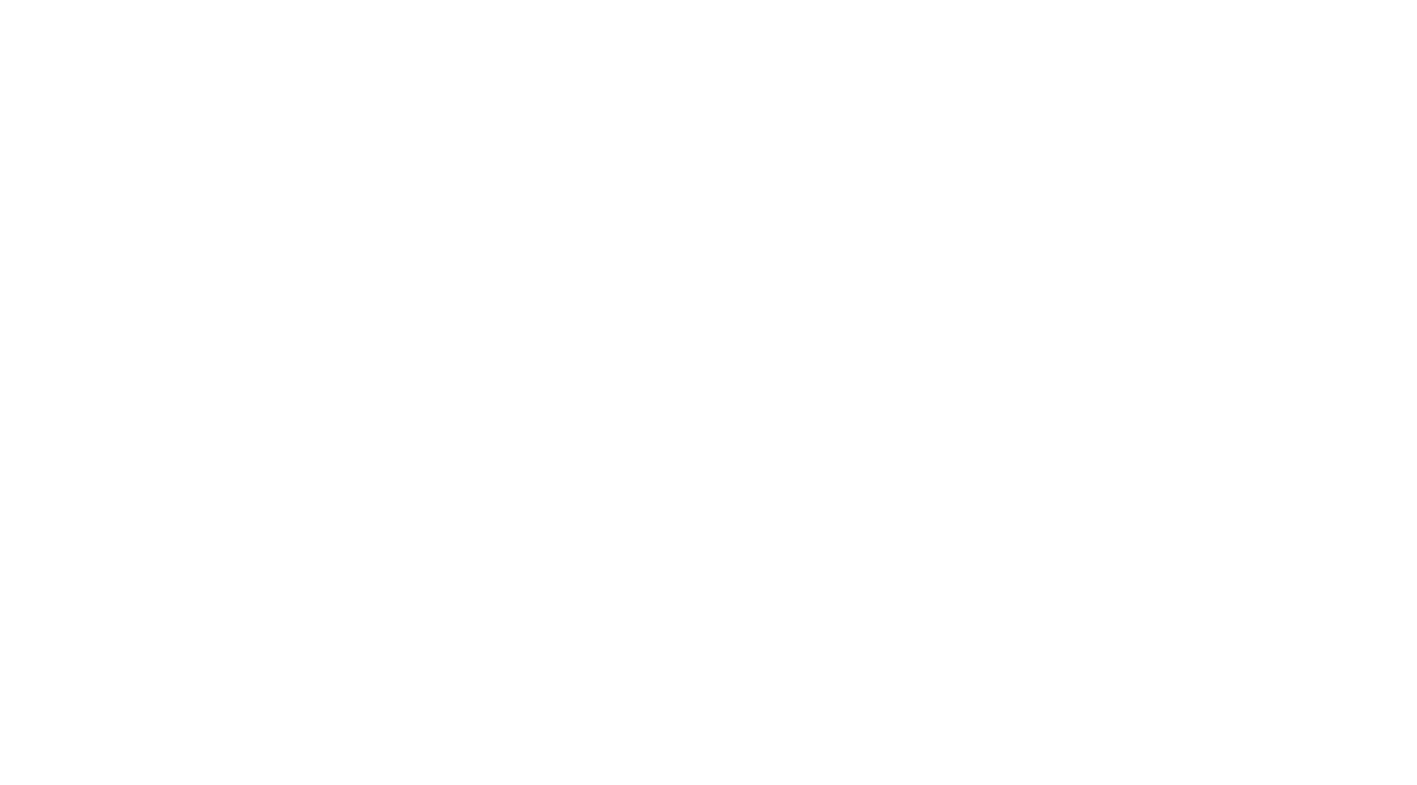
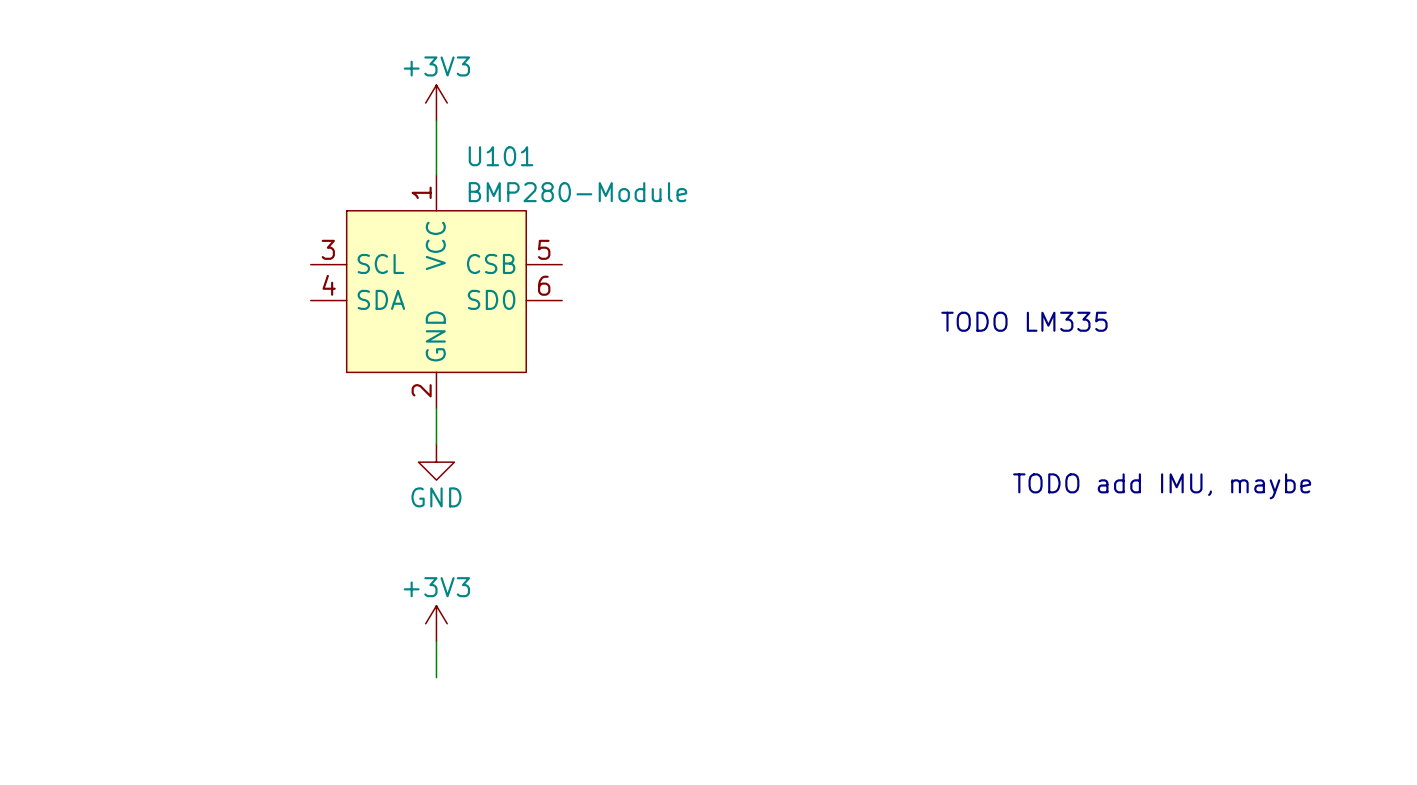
power symbol: none -> +3V3 (436, 103)
wire: none -> (436, 120) (436, 174)
U101: none -> BMP280-Module (436, 291)
text: none -> TODO LM335 (1024, 321)
wire: none -> (436, 408) (436, 444)
power symbol: none -> GND (436, 462)
text: none -> TODO add IMU, maybe (1162, 486)
power symbol: none -> +3V3 (436, 623)
wire: none -> (436, 641) (436, 677)

